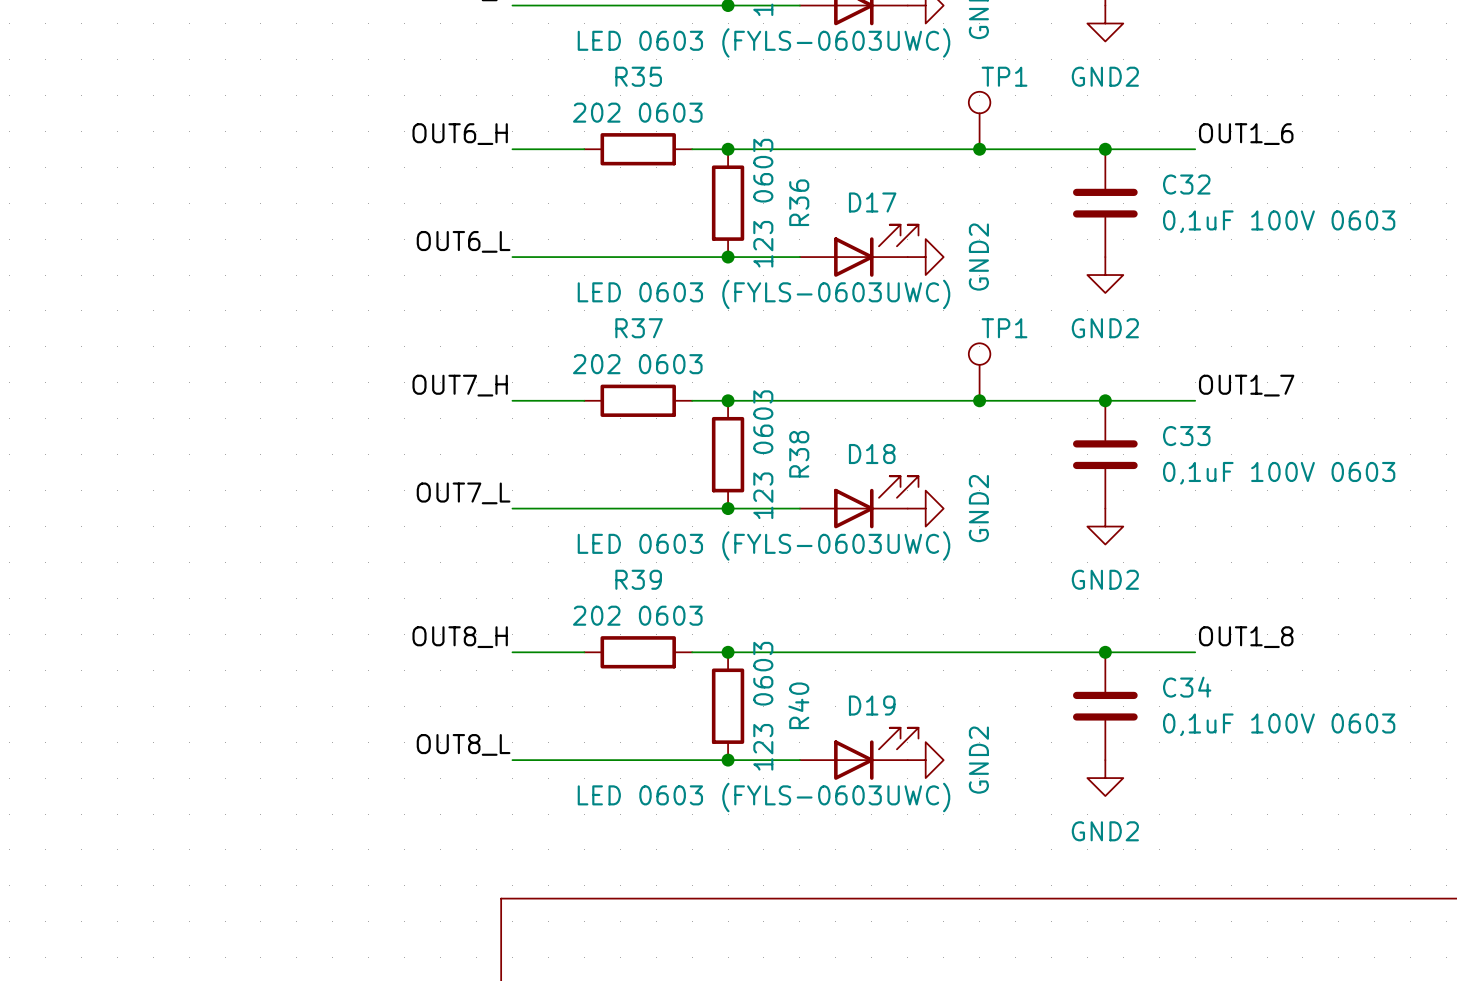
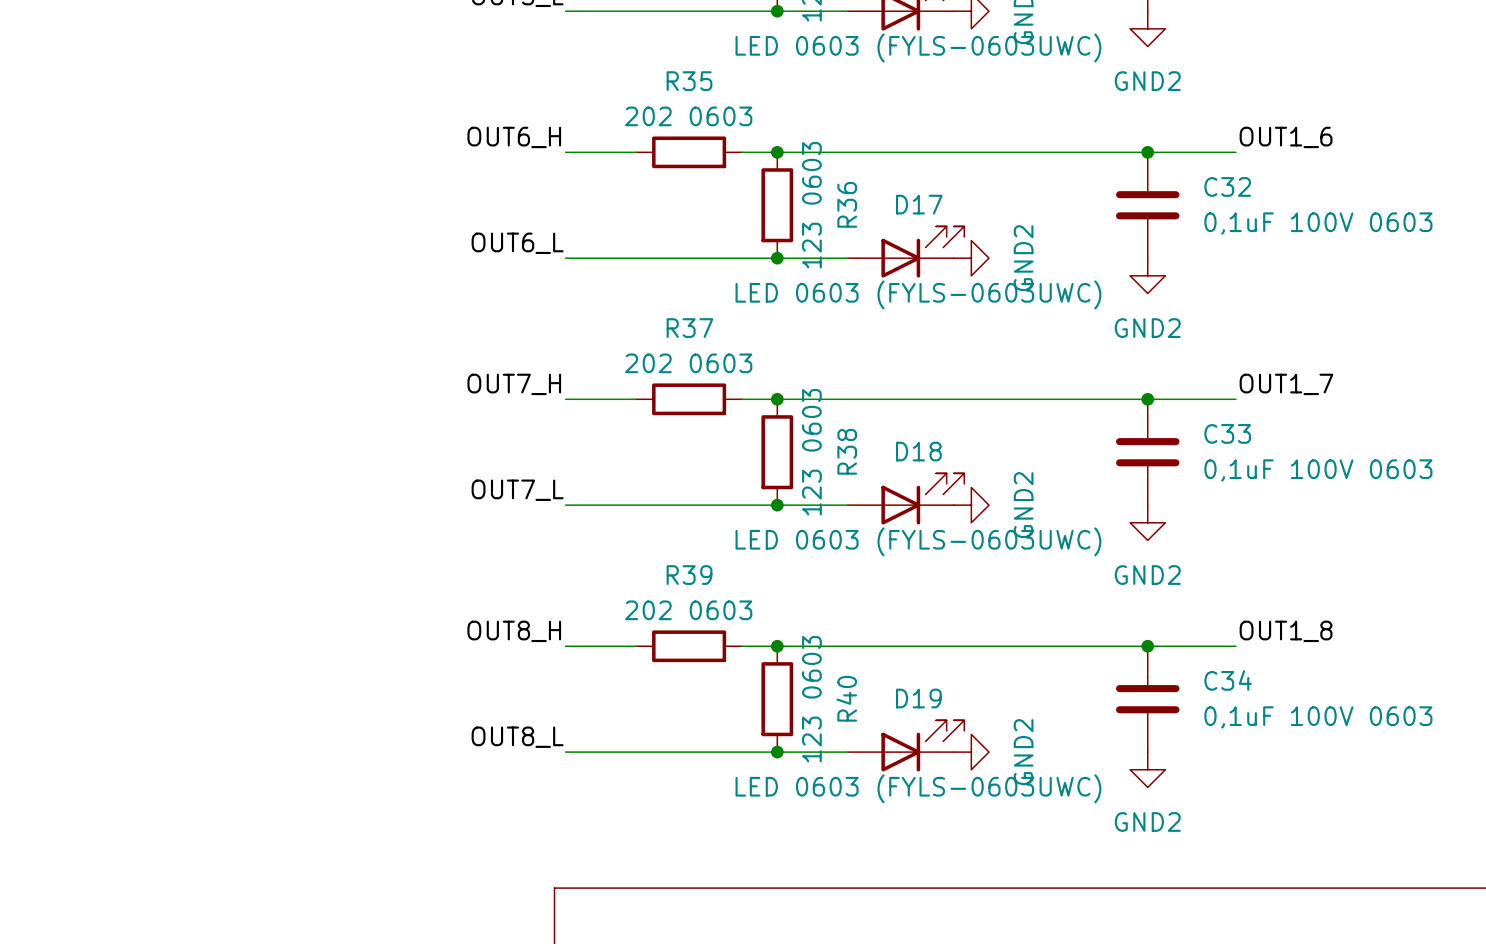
part value position: LED 0603 (FYLS-0603UWC) (763, 42) -> LED 0603 (FYLS-0603UWC) (918, 47)
TP1: (979, 120) -> none
junction: (979, 149) -> none
D17 value position: LED 0603 (FYLS-0603UWC) (763, 294) -> LED 0603 (FYLS-0603UWC) (918, 294)
TP1: (979, 372) -> none
junction: (979, 400) -> none
D18 value position: LED 0603 (FYLS-0603UWC) (763, 545) -> LED 0603 (FYLS-0603UWC) (918, 541)
D19 value position: LED 0603 (FYLS-0603UWC) (763, 797) -> LED 0603 (FYLS-0603UWC) (918, 788)

